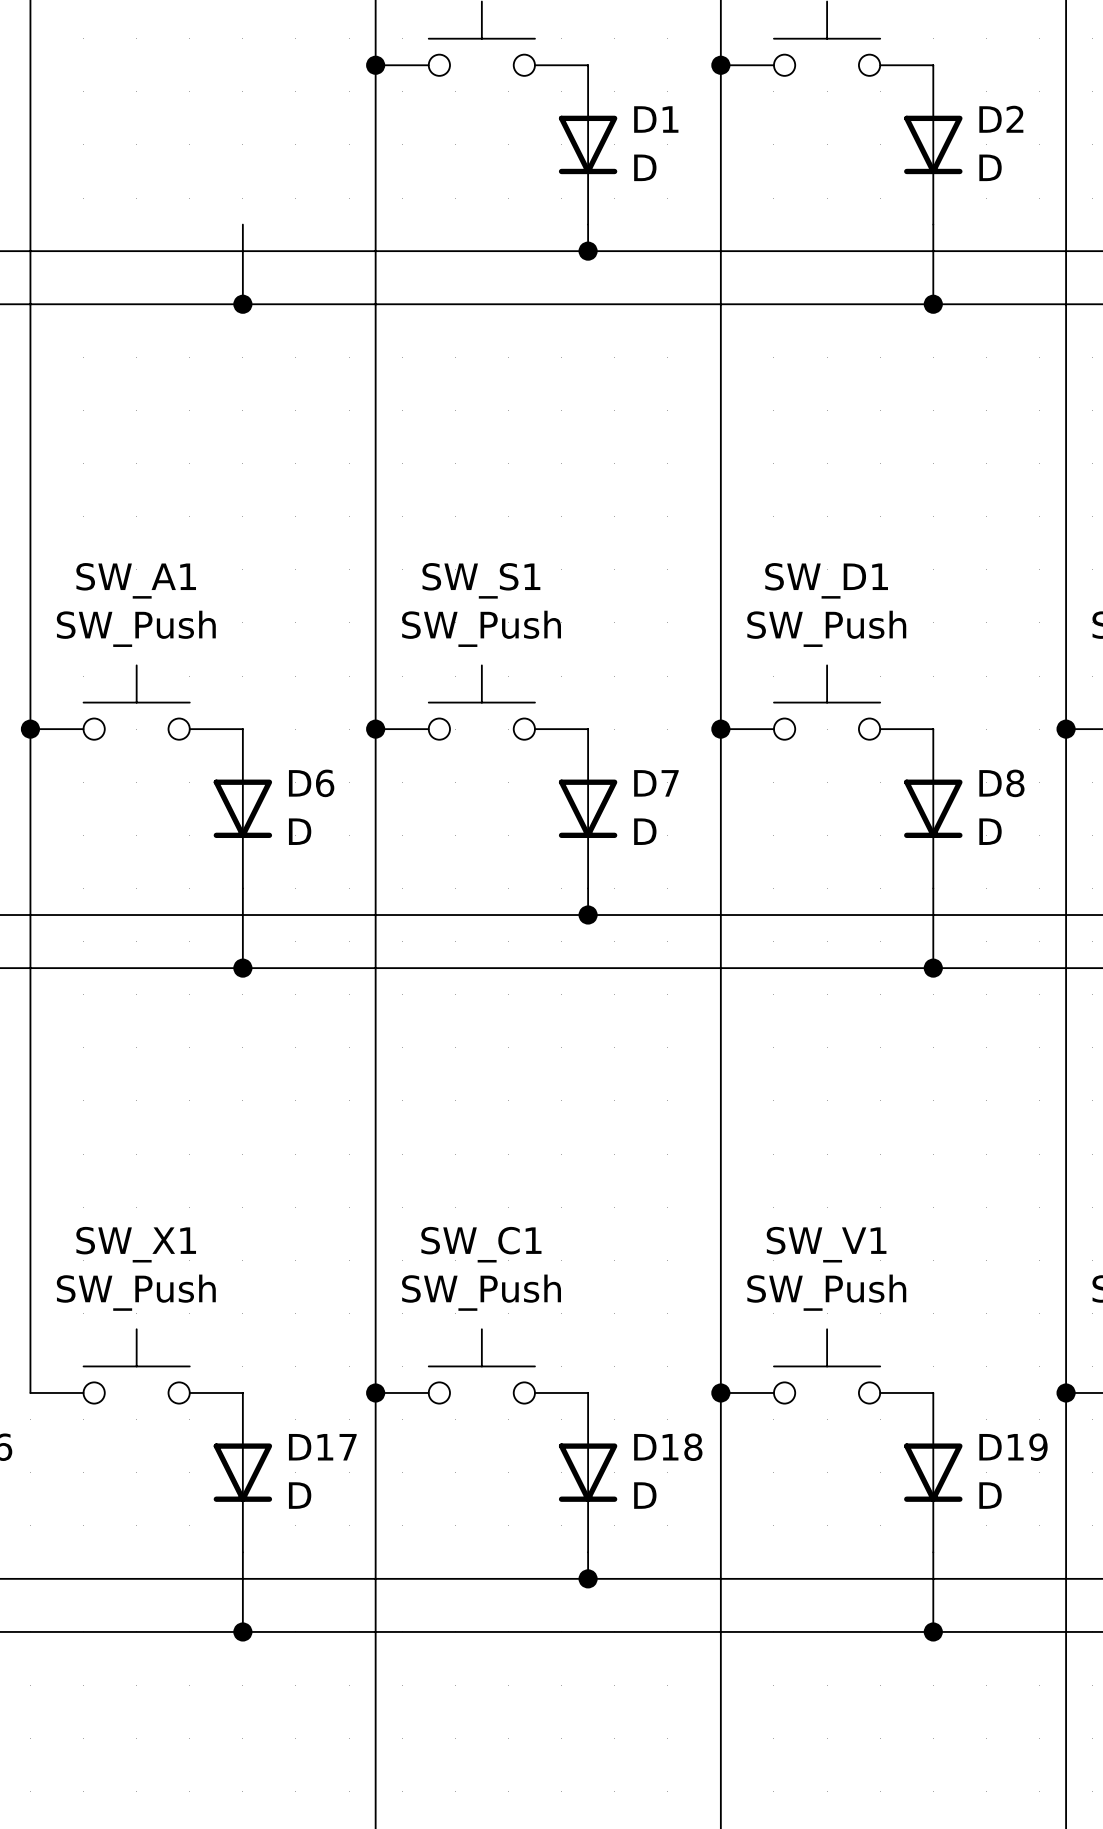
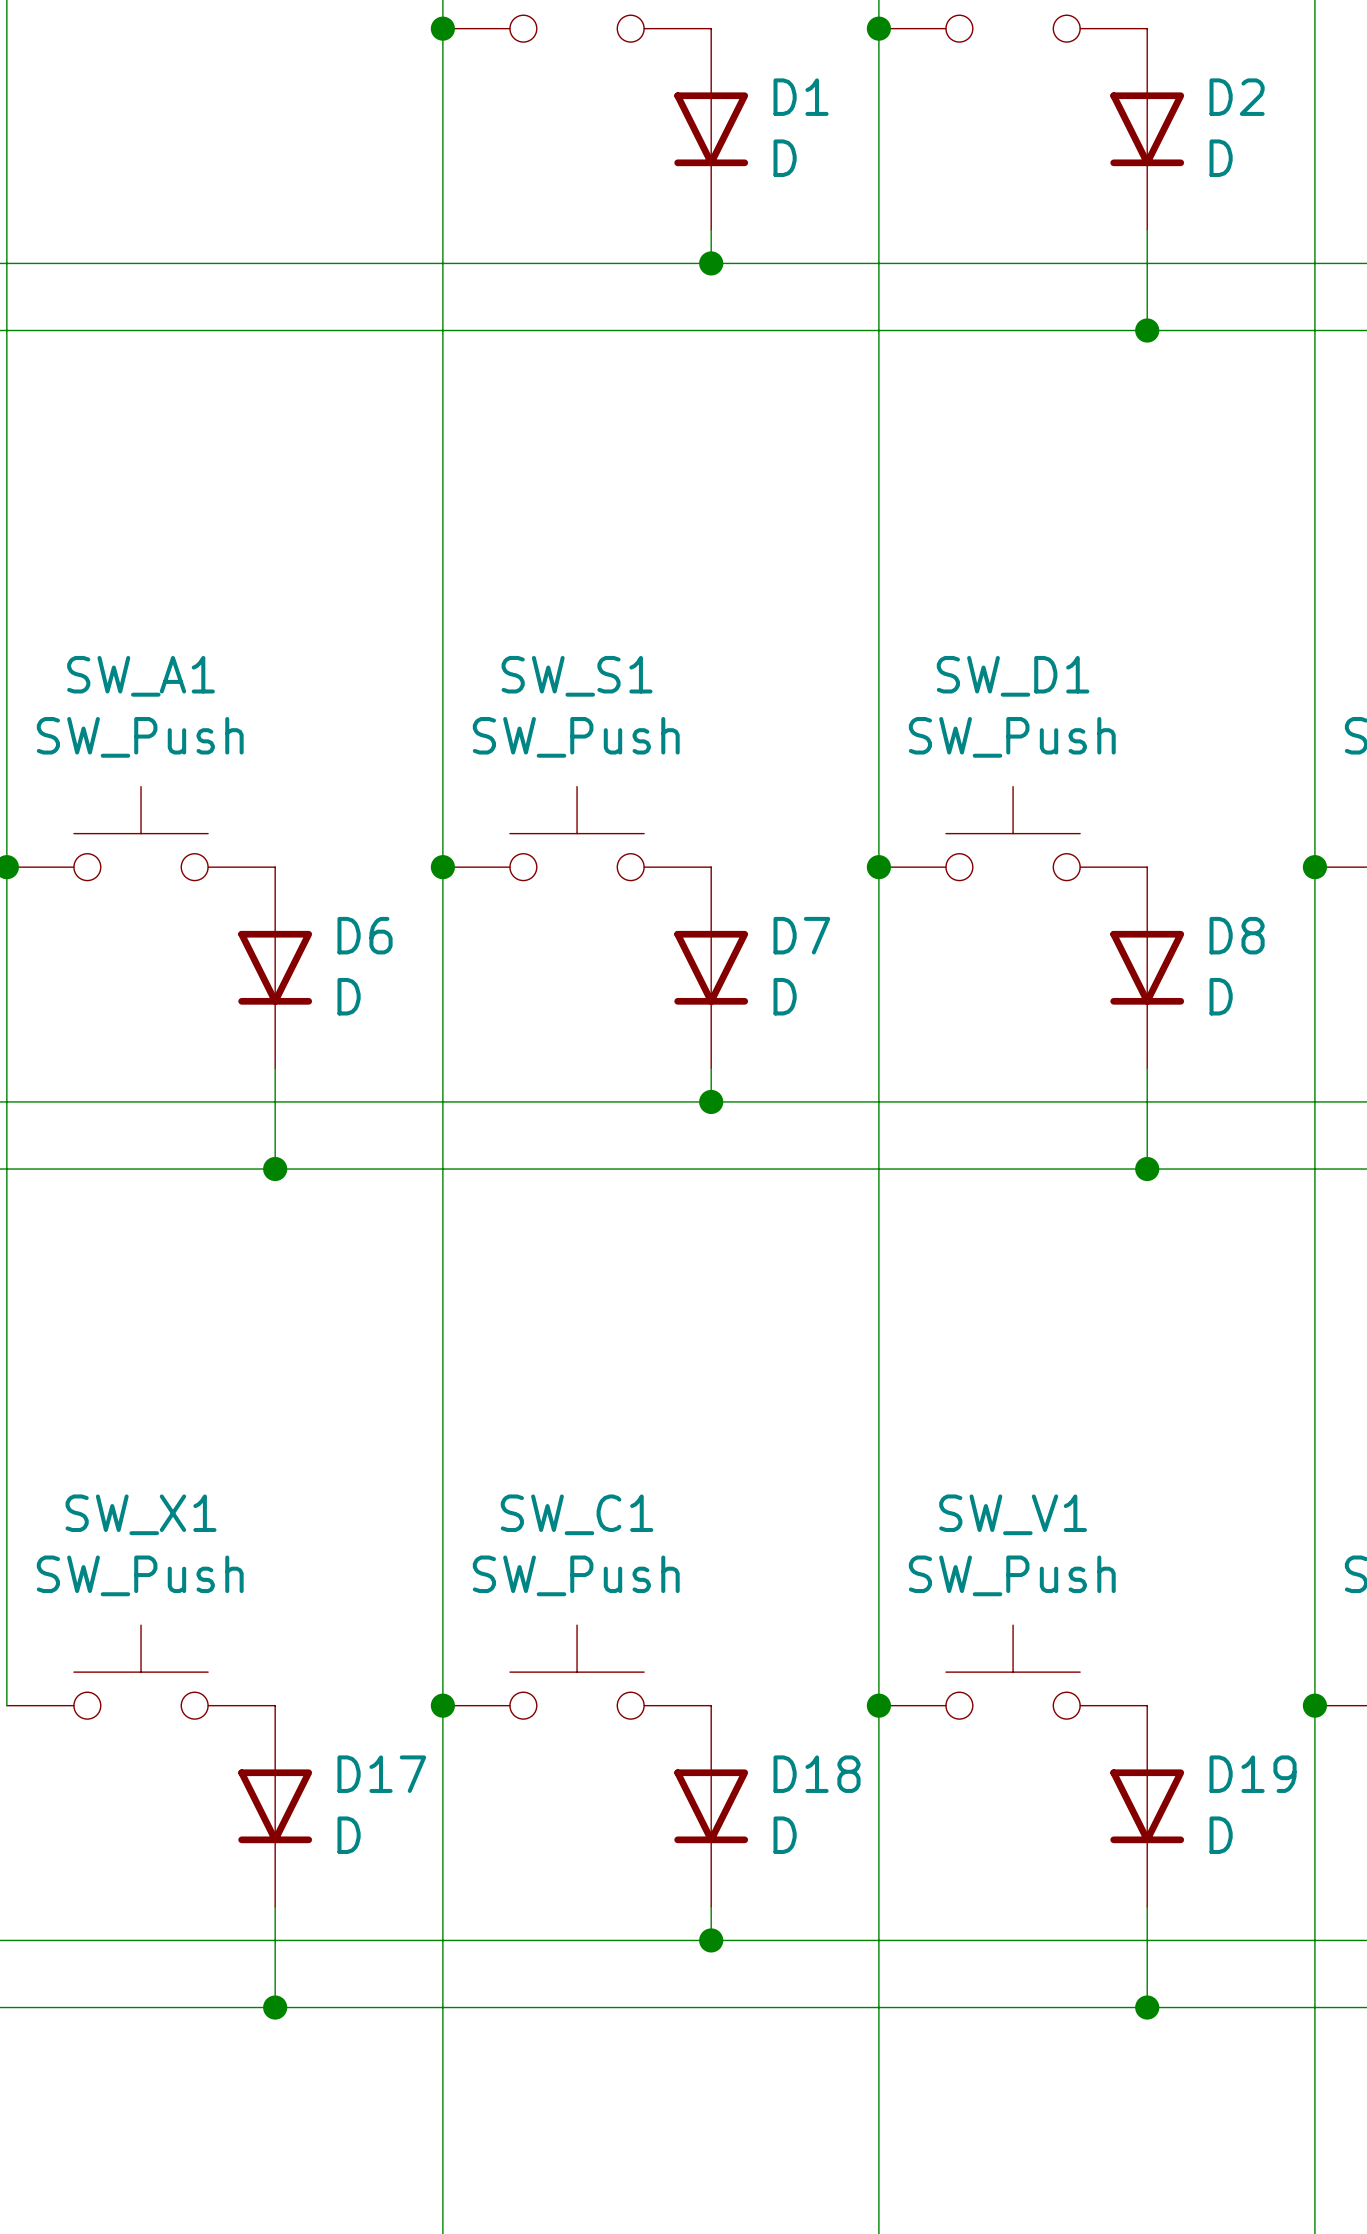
wire: (242, 224) (242, 304) -> none
junction: (242, 304) -> none

